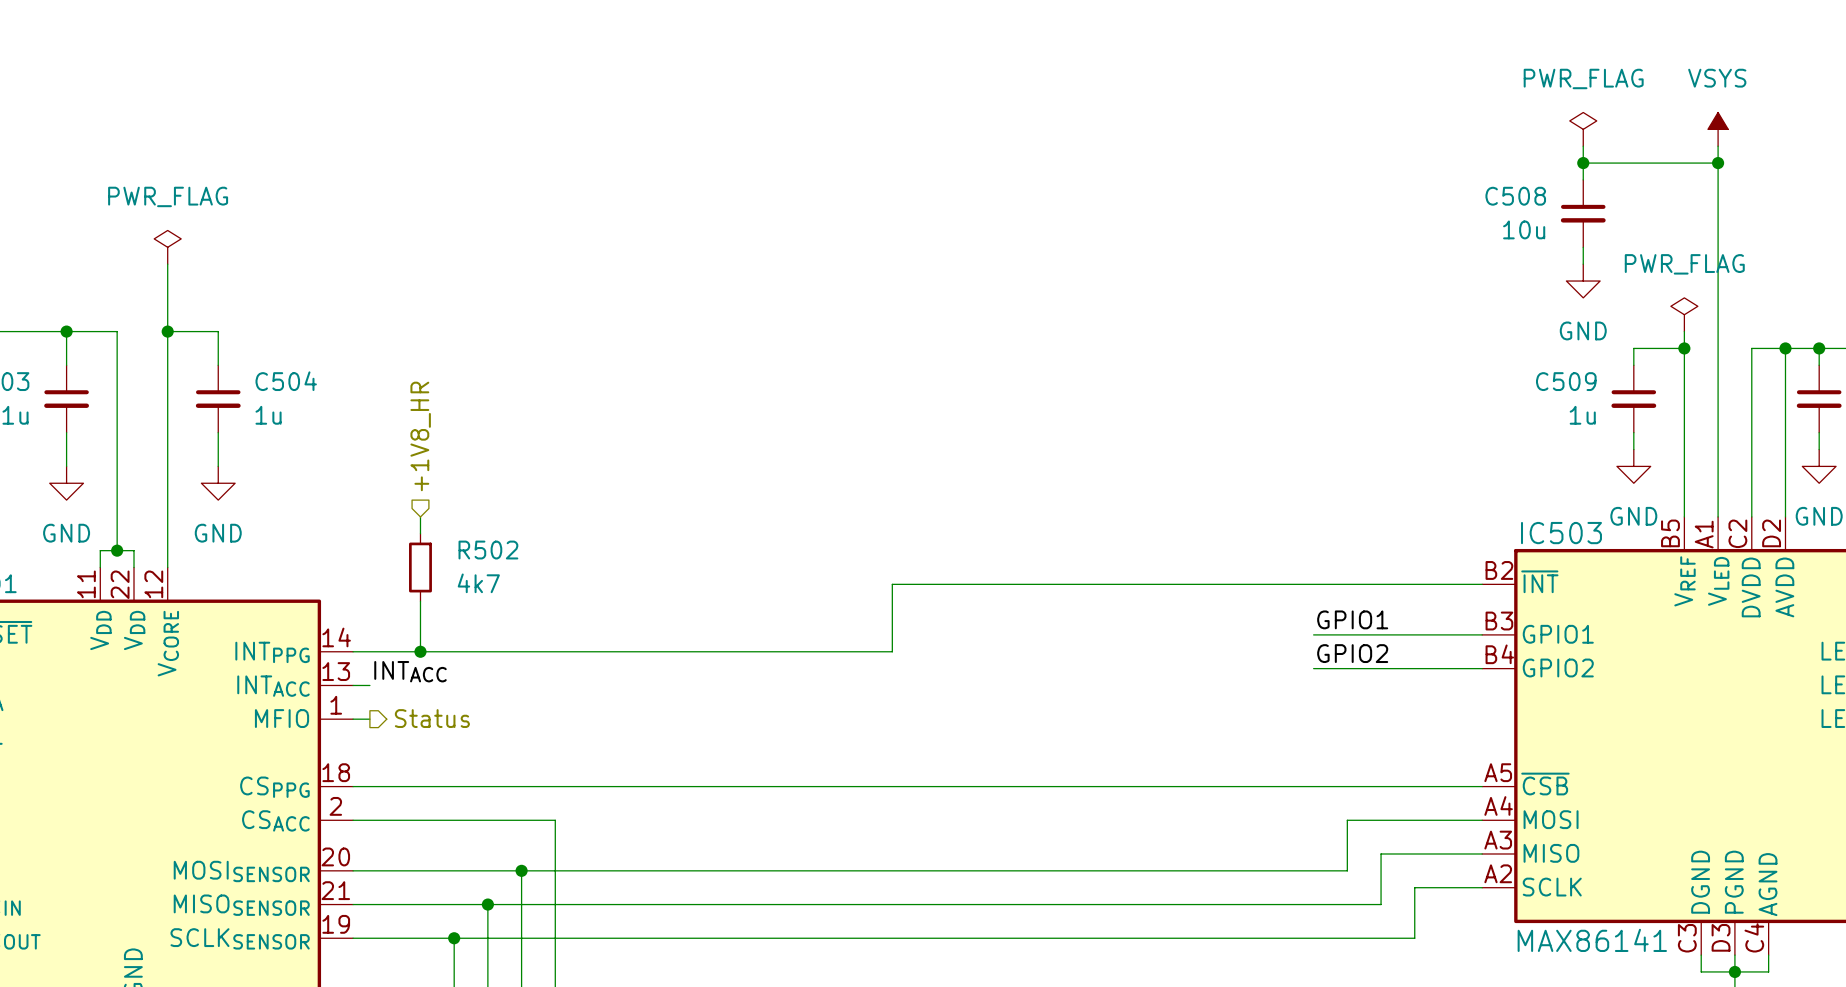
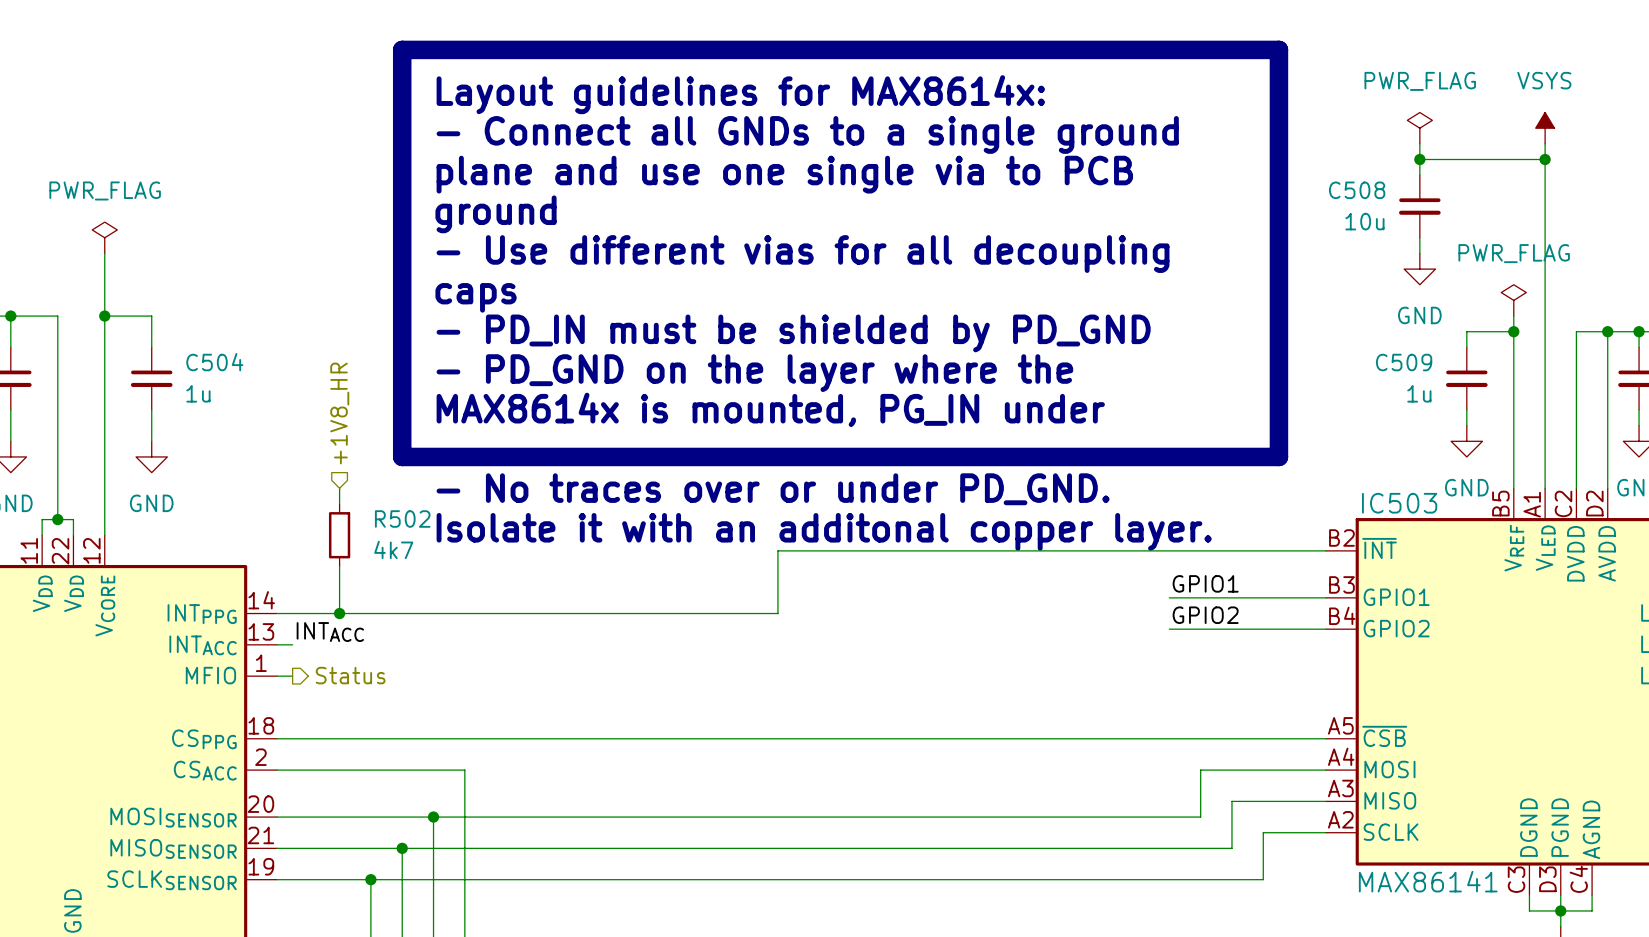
line: none -> (402, 49) (1278, 49) (1278, 456) (402, 456) (402, 49)
text: none -> Layout guidelines for MAX8614x: (740, 94)
text: none -> - Connect all GNDs to a single ground (807, 134)
text: none -> plane and use one single via to PCB (784, 174)
text: none -> ground (496, 214)
text: none -> - Use different vias for all decoupling (803, 254)
text: none -> caps (476, 297)
text: none -> - PD_IN must be shielded by PD_GND (793, 333)
text: none -> - PD_GND on the layer where the (754, 373)
text: none -> MAX8614x is mounted, PG_IN under (770, 409)
text: none -> - No traces over or under PD_GND. (773, 489)
text: none -> Isolate it with an additonal copper layer. (824, 531)

